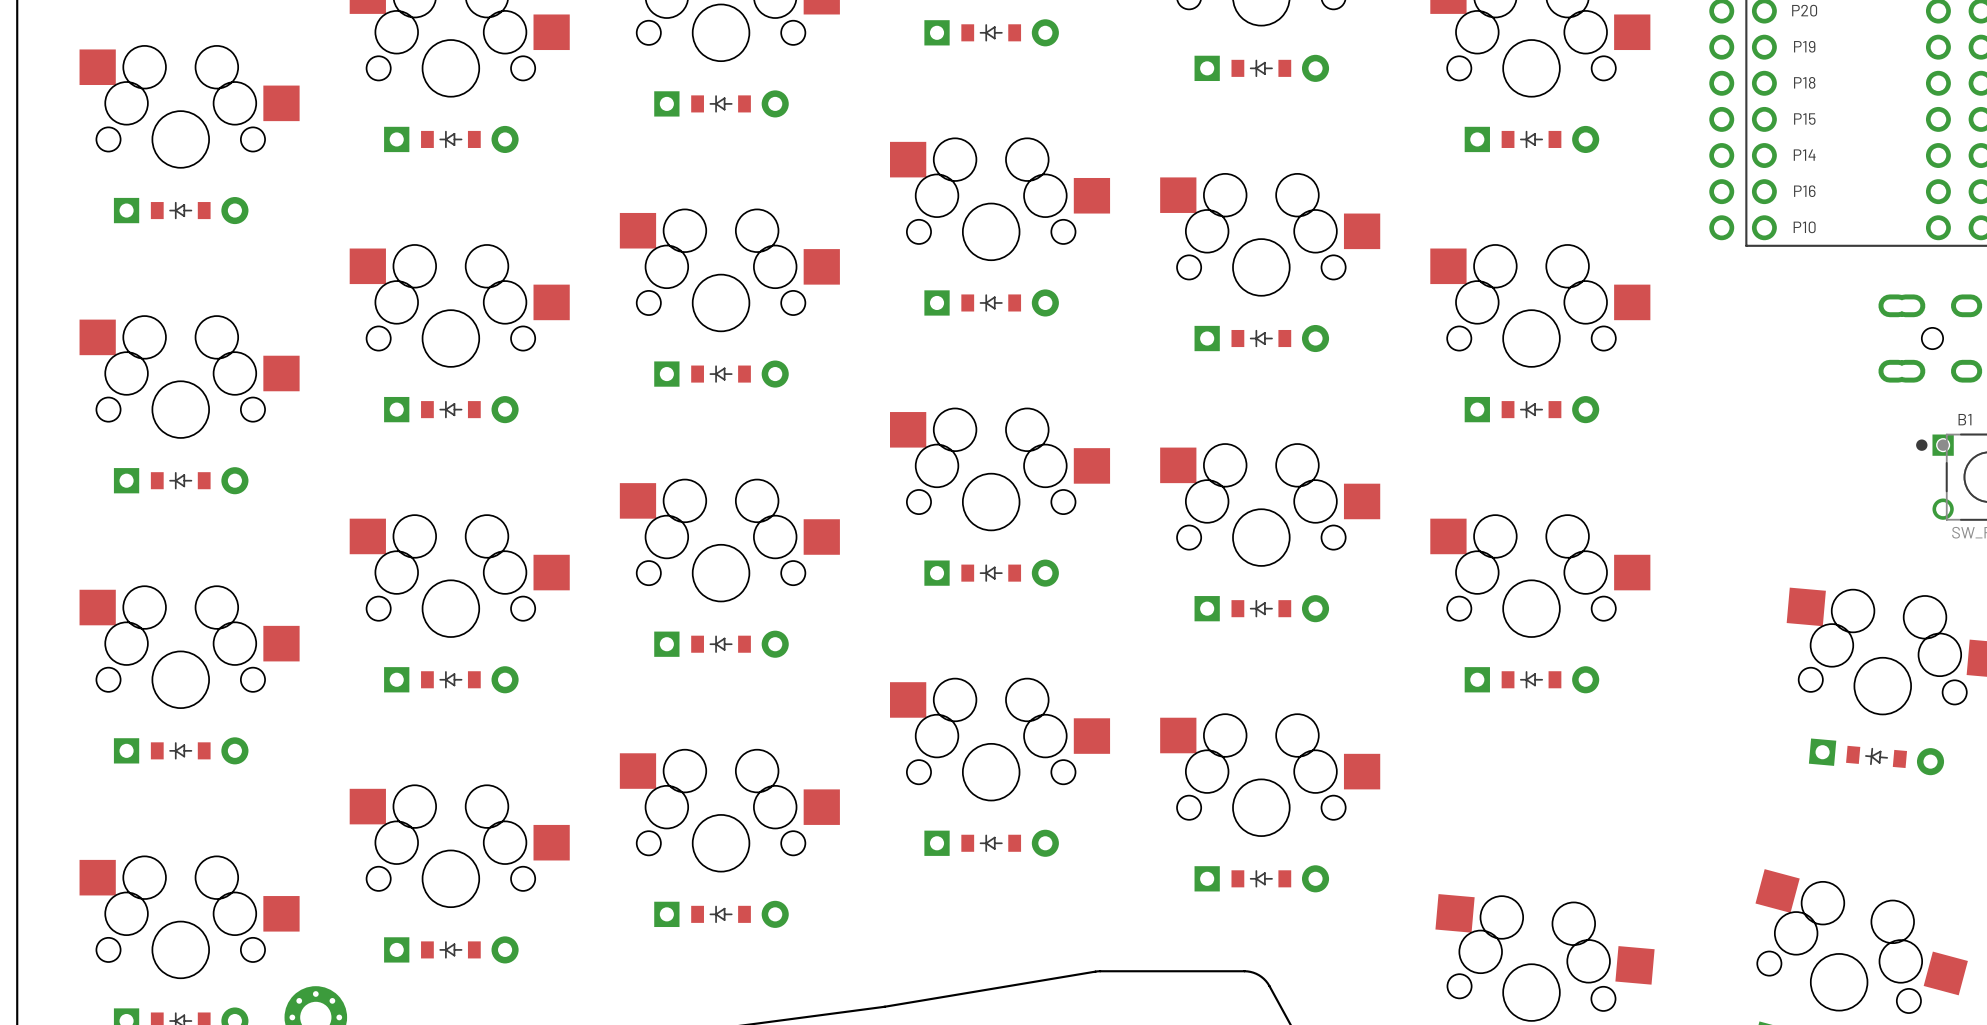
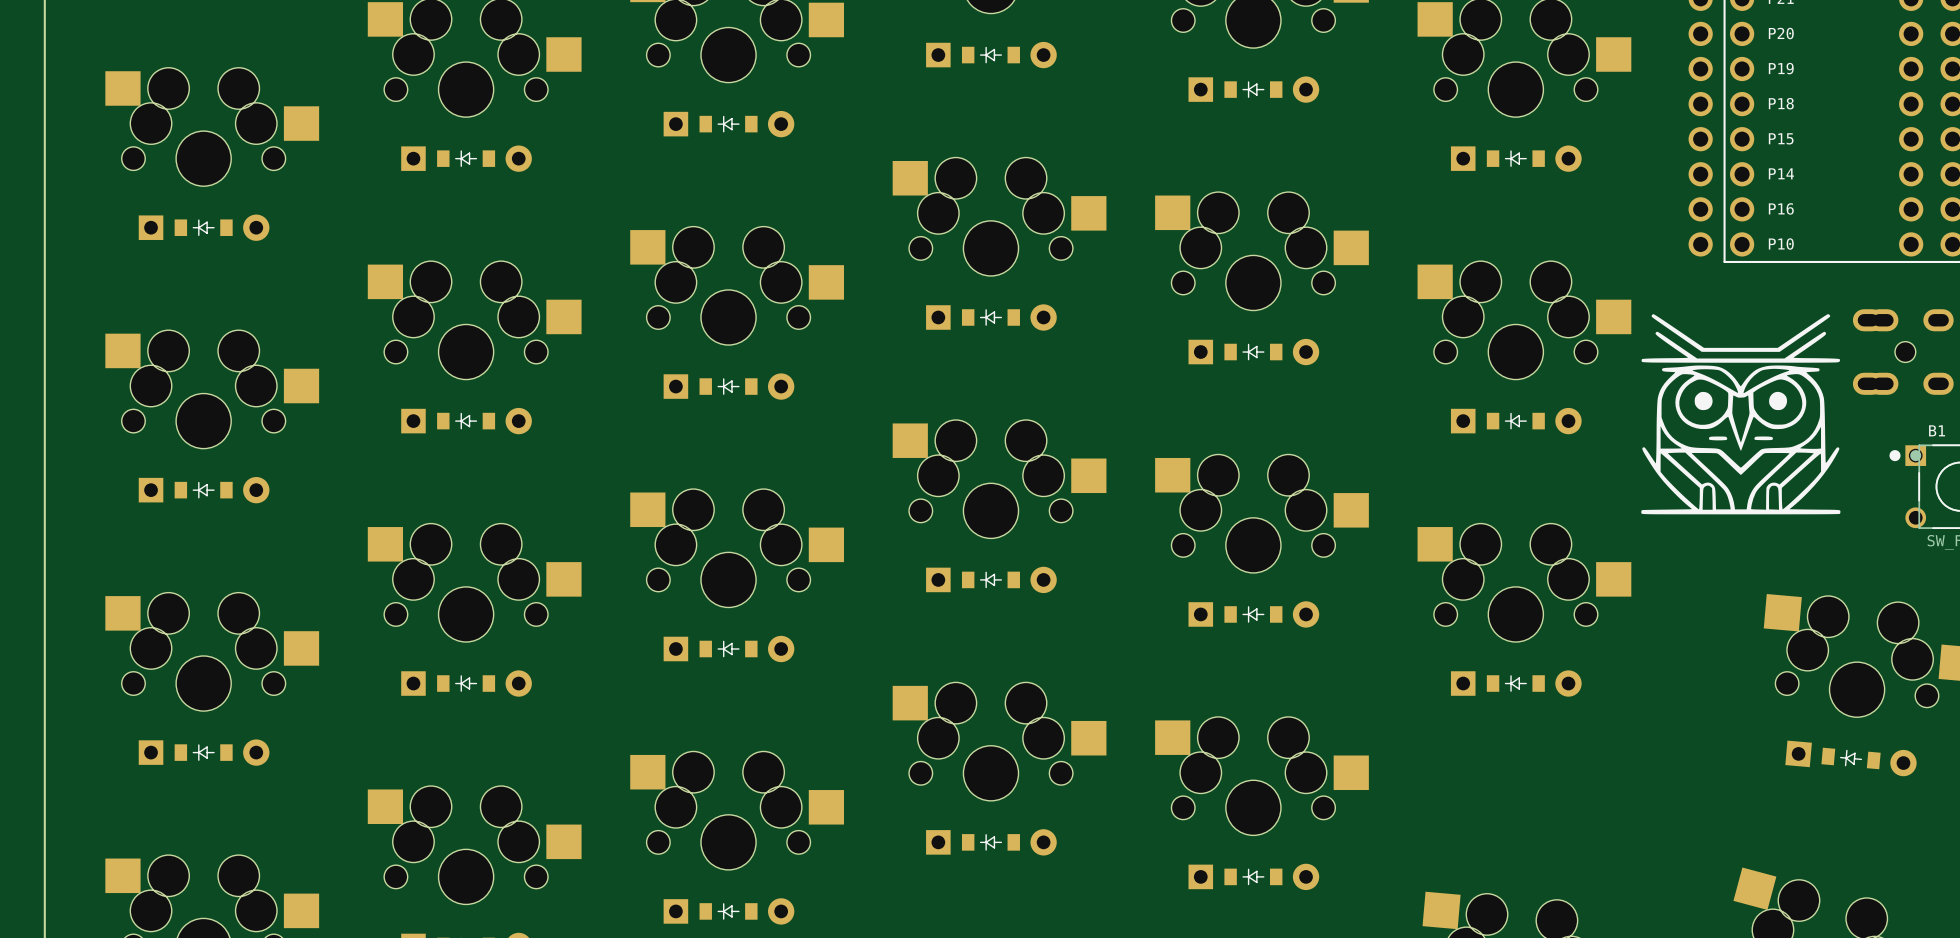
drawing: none -> [1641, 314, 1841, 515]

